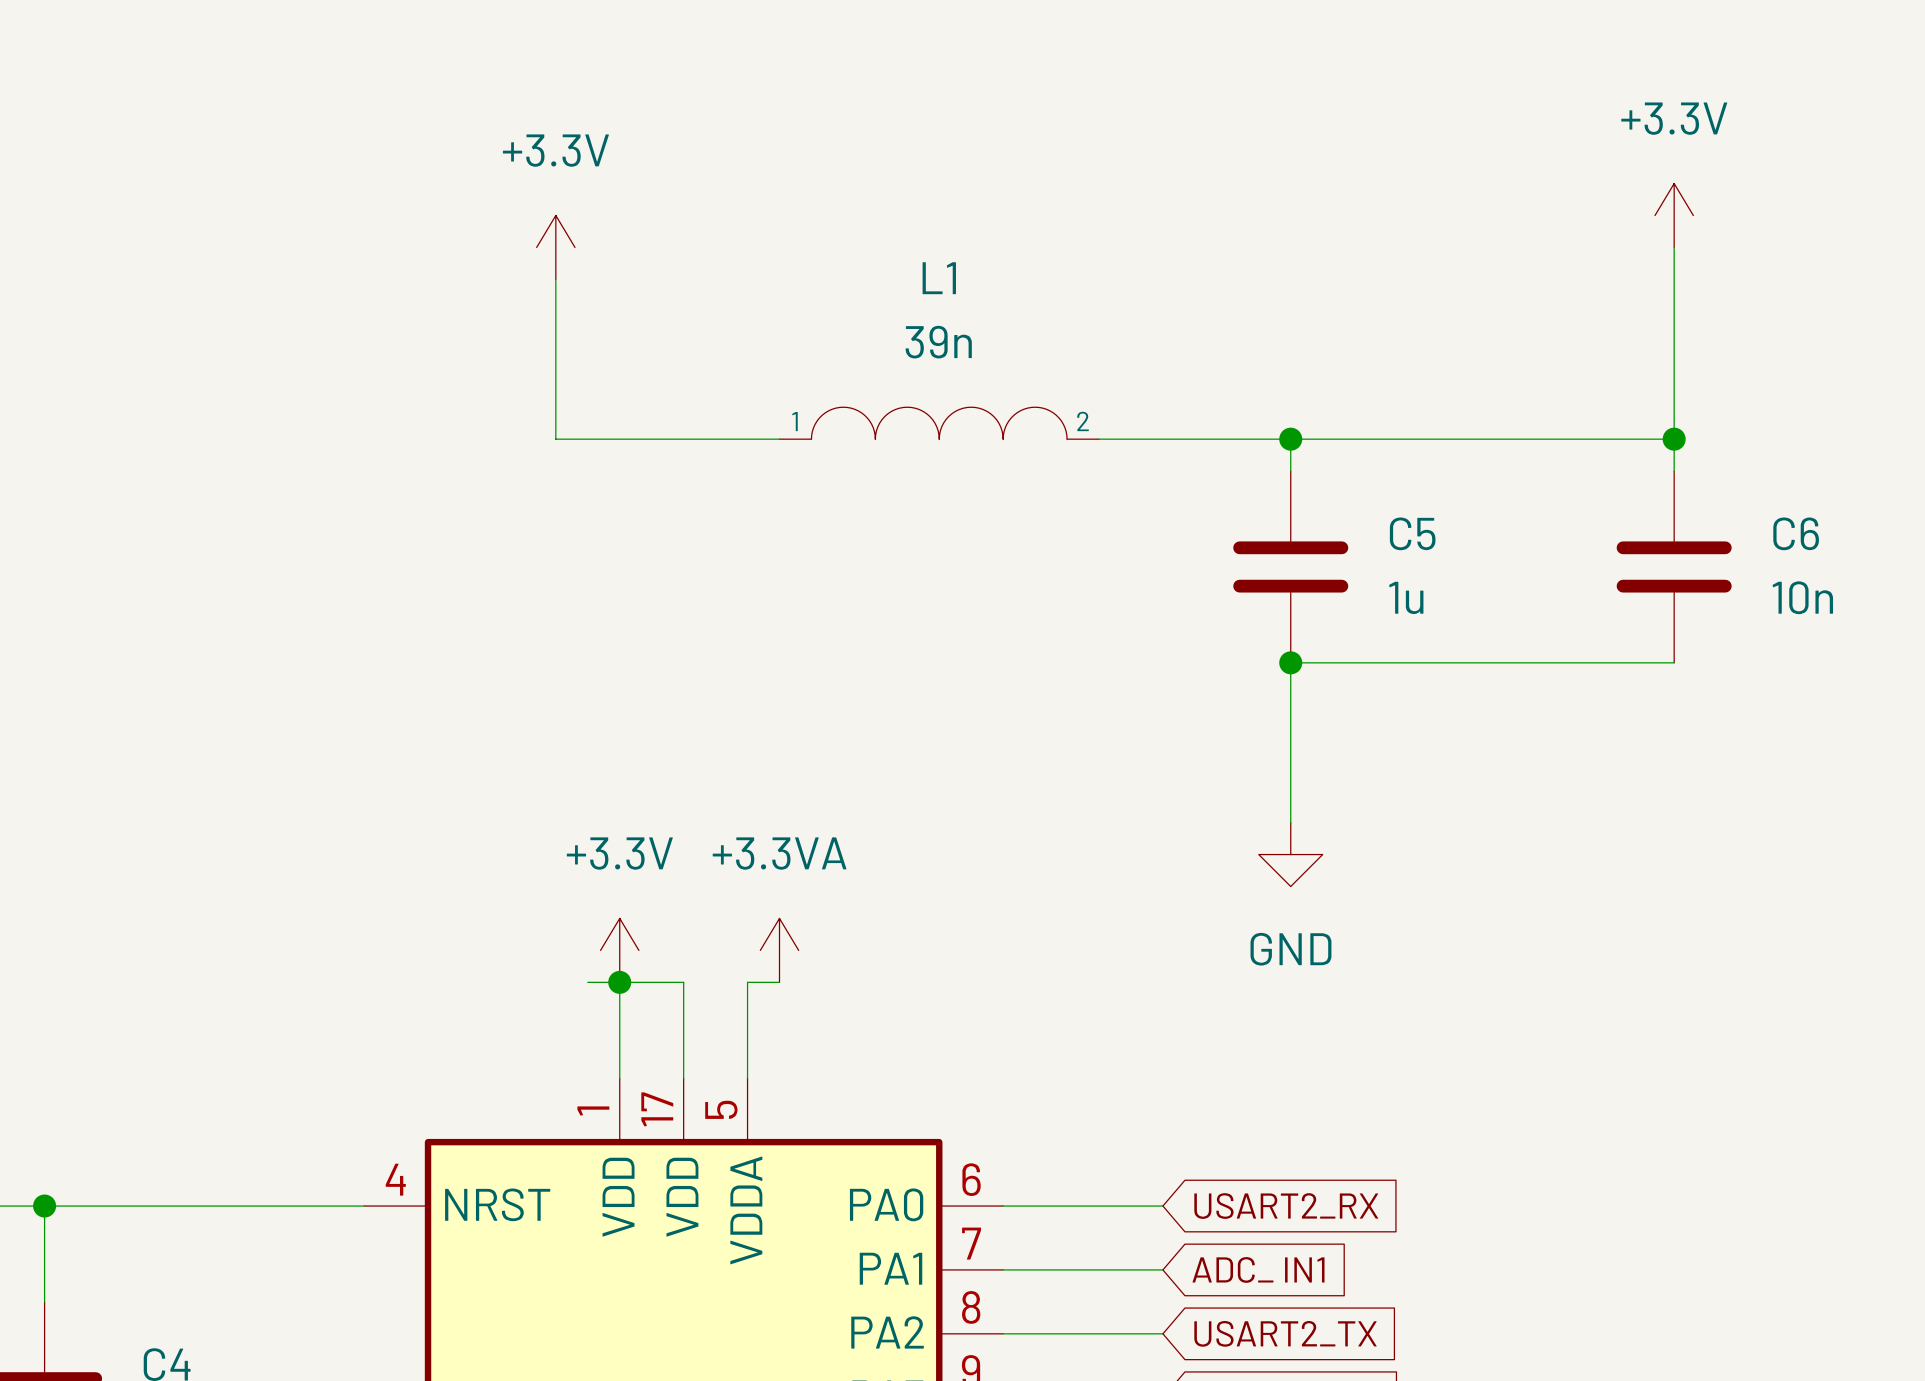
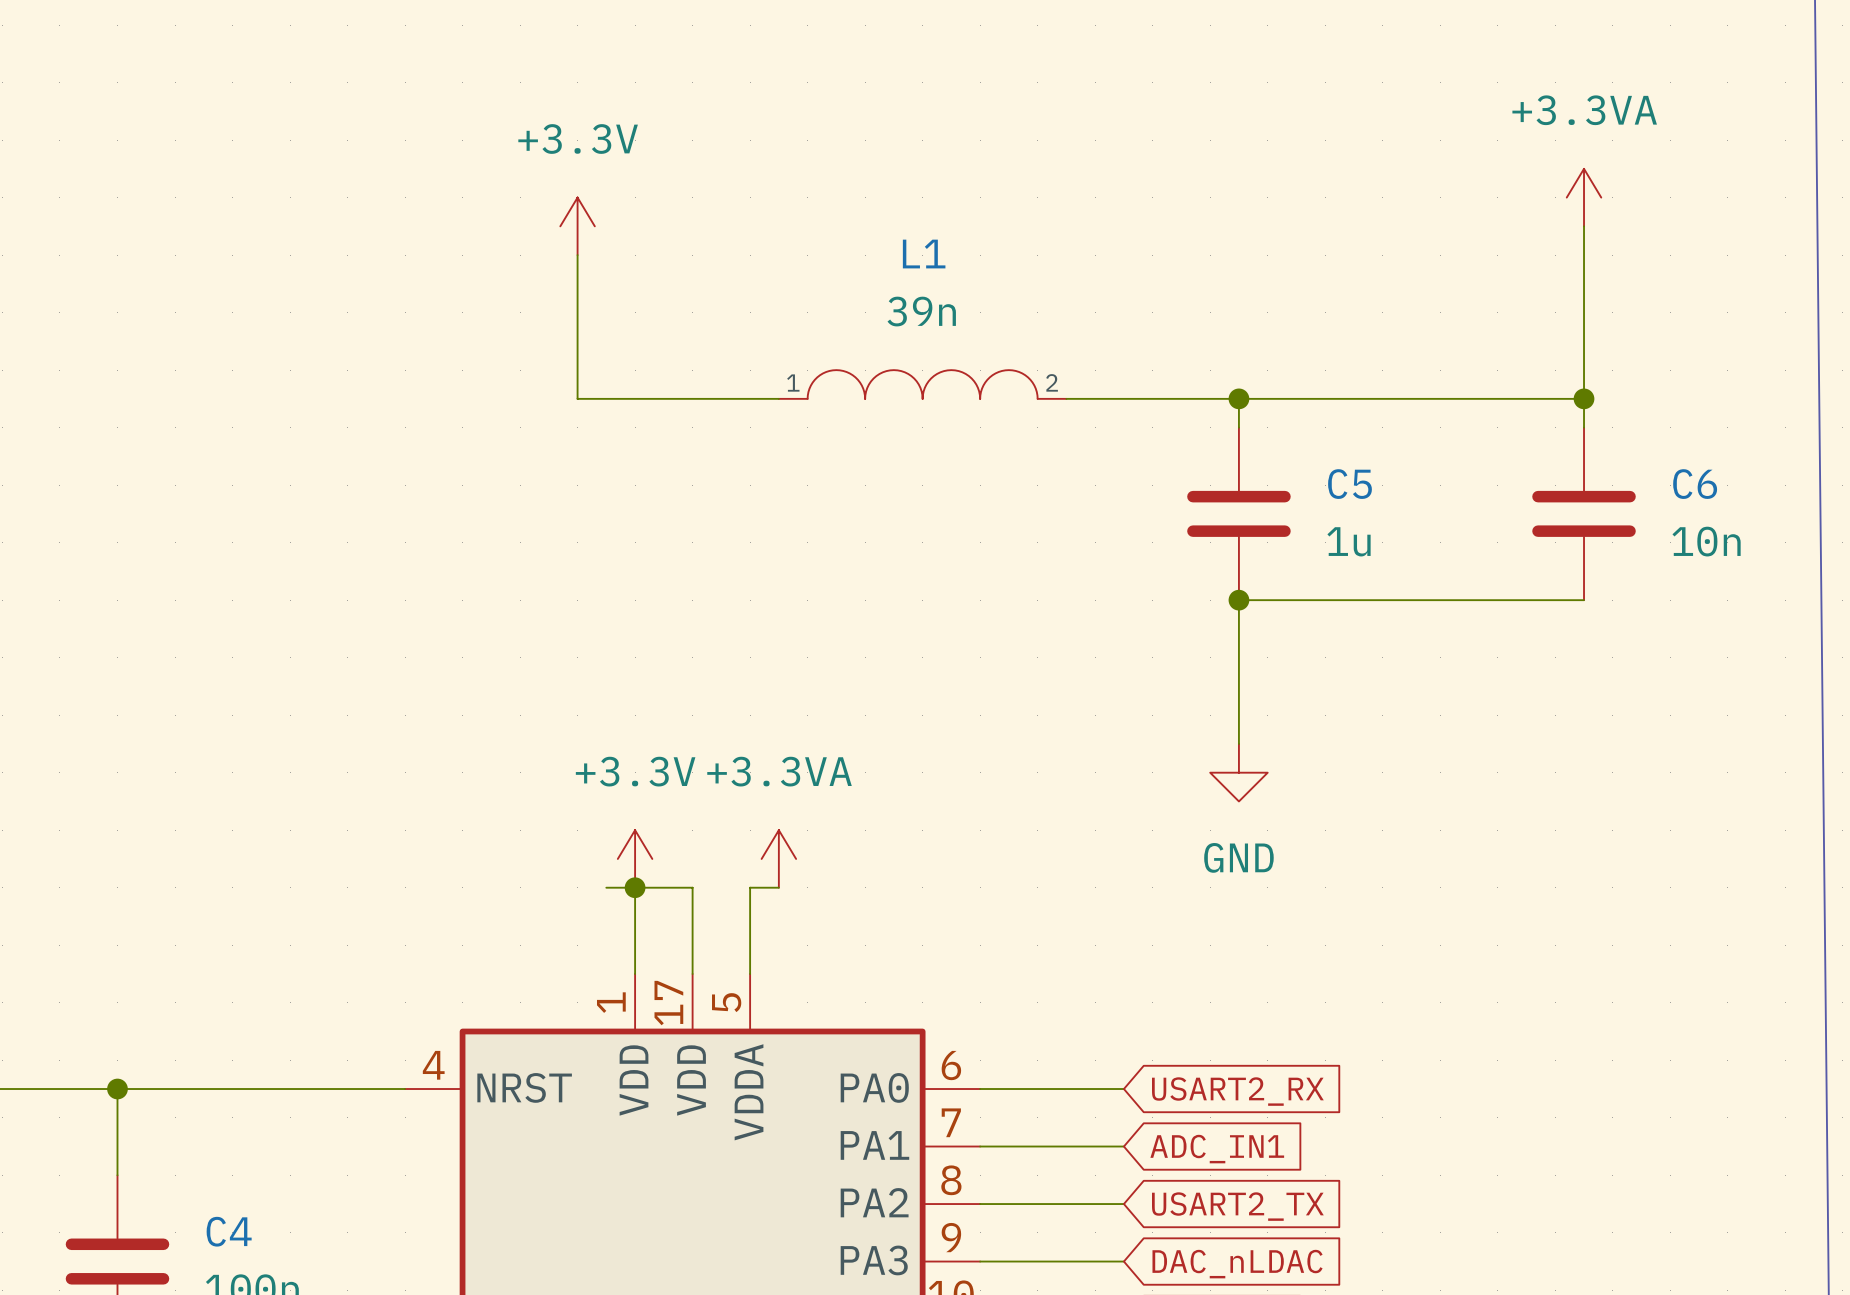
power symbol: +3.3V (1674, 215) -> +3.3VA (1584, 197)
global label: ADC_ IN1 (1258, 1269) -> ADC_IN1 (1217, 1149)

